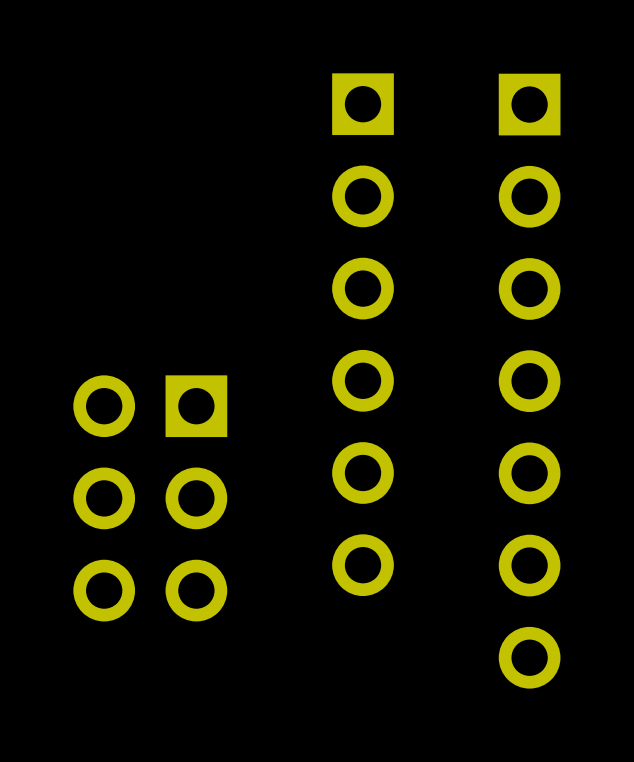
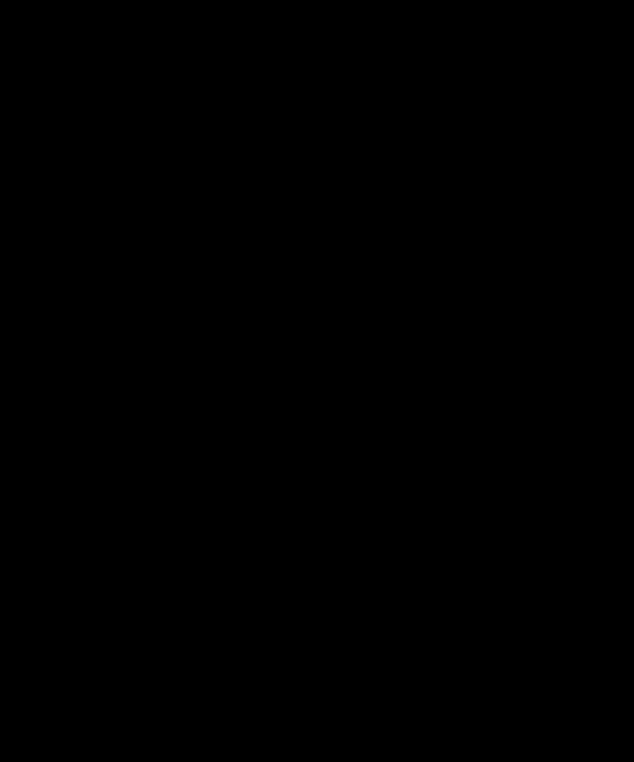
part: (363, 334) -> none
part: (529, 381) -> none
part: (150, 498) -> none

